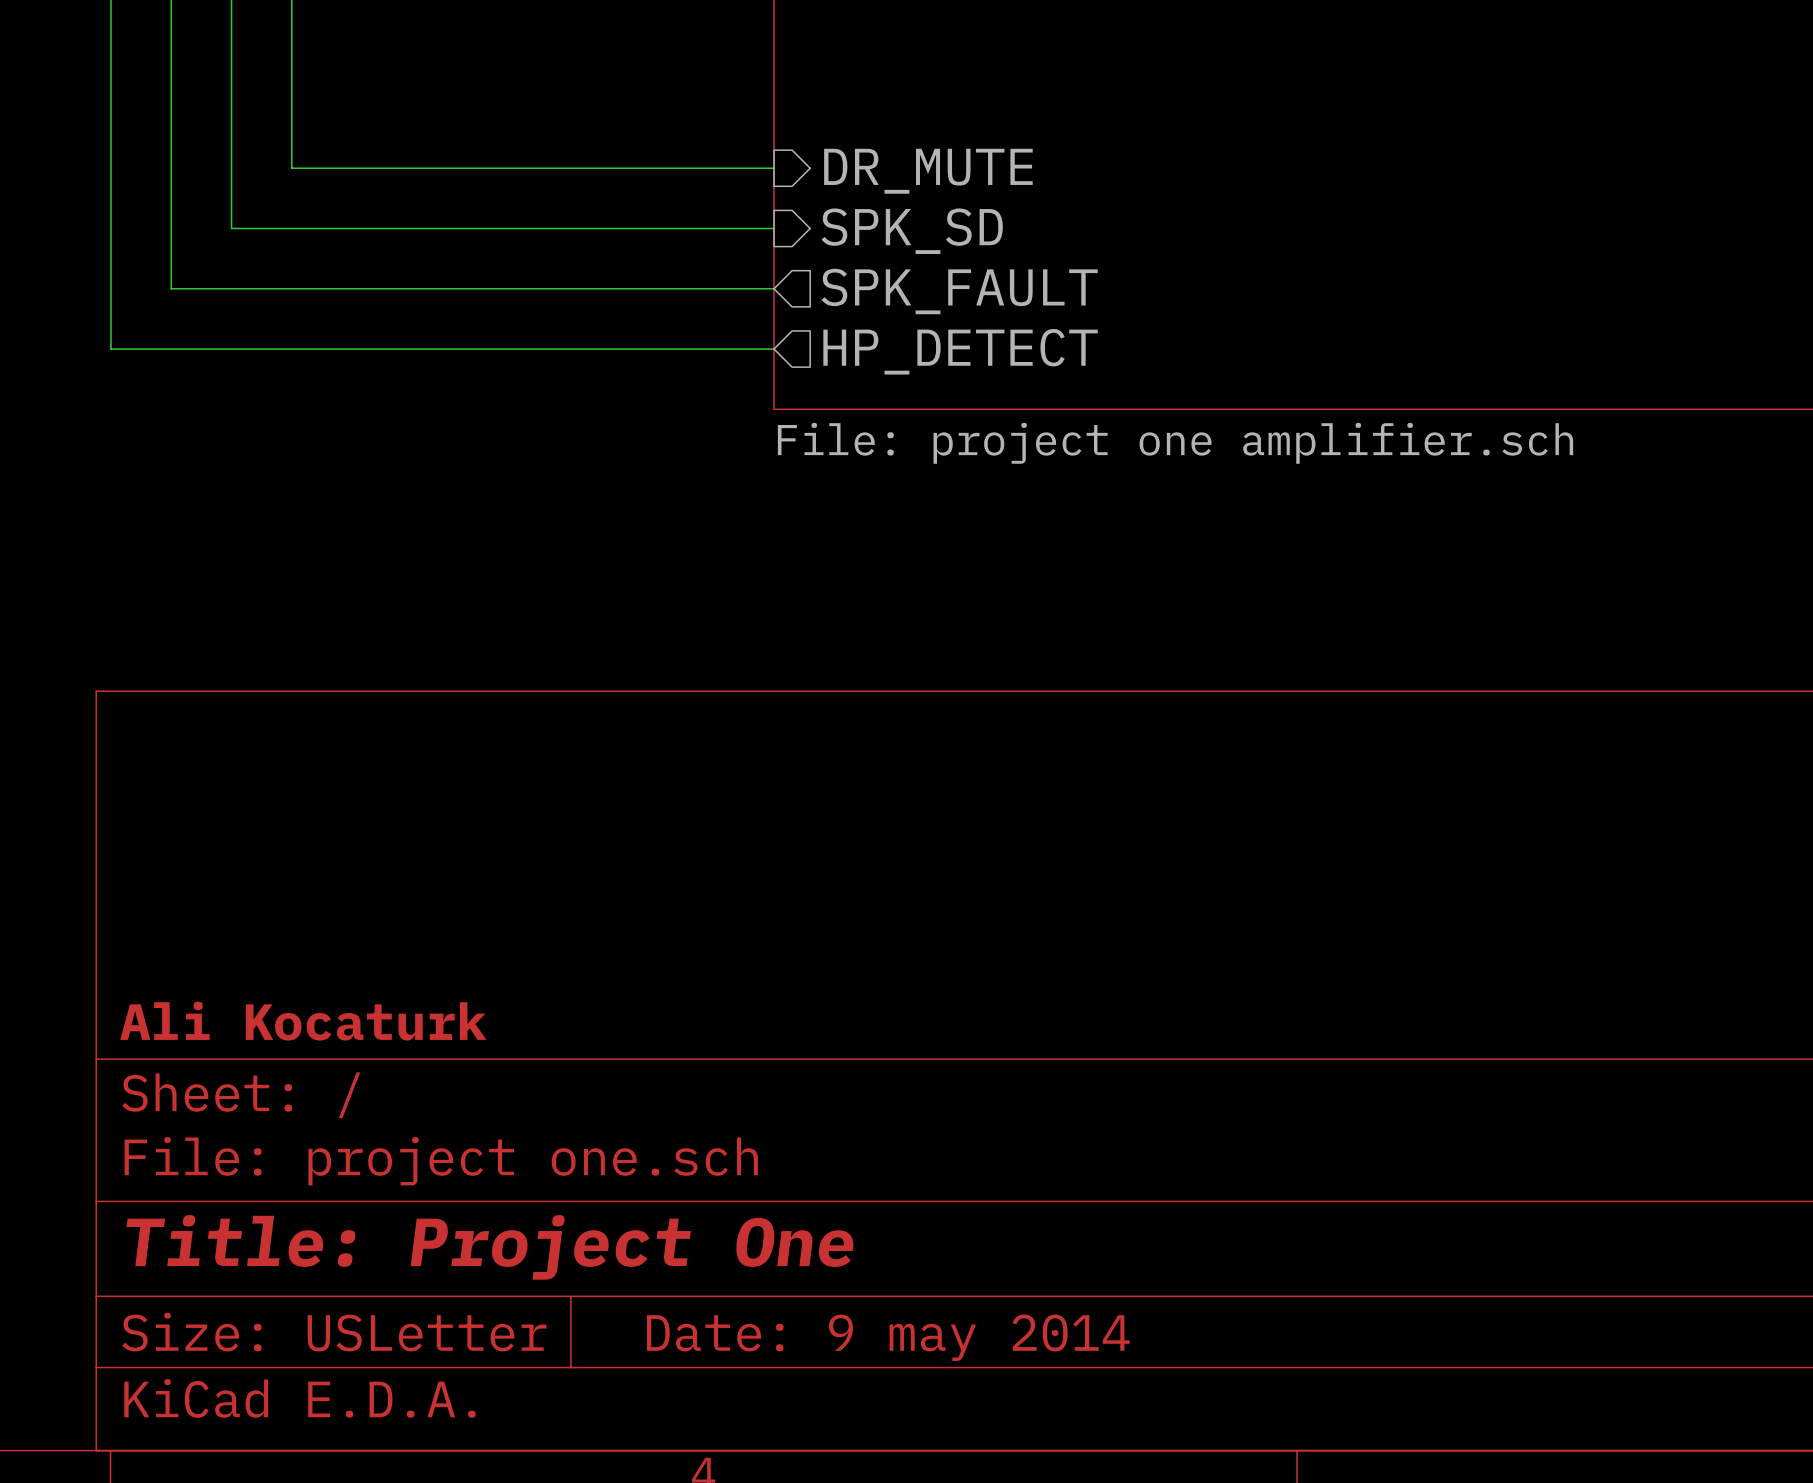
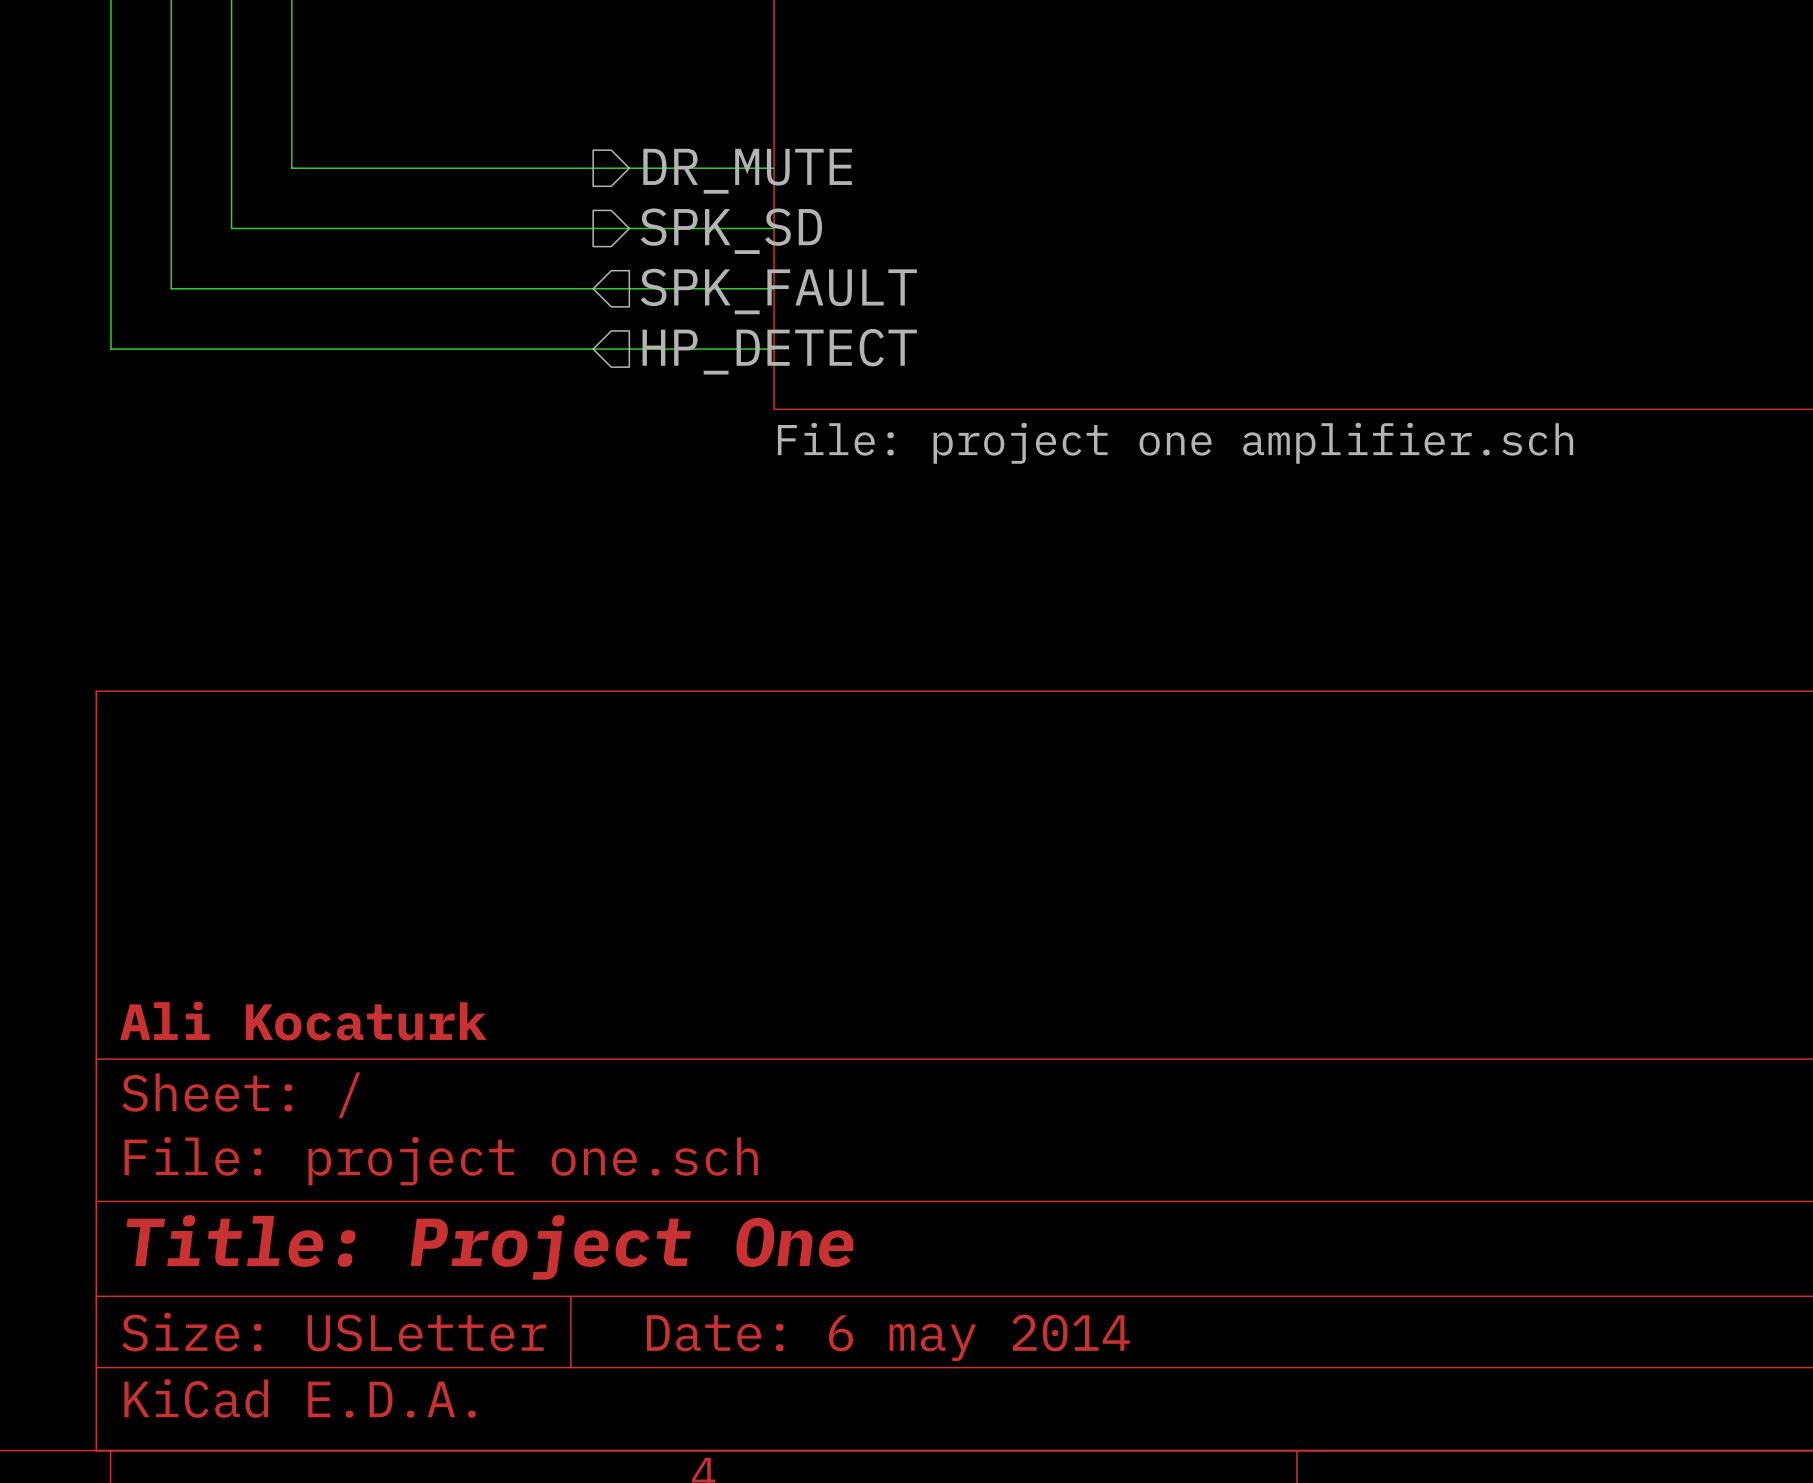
sheet pin position: DR_MUTE (928, 171) -> DR_MUTE (747, 171)
sheet pin position: SPK_SD (912, 231) -> SPK_SD (731, 231)
sheet pin position: SPK_FAULT (959, 291) -> SPK_FAULT (778, 291)
sheet pin position: HP_DETECT (960, 351) -> HP_DETECT (779, 351)
title block: Date: 9 may 2014 (888, 1337) -> Date: 6 may 2014 (888, 1337)

